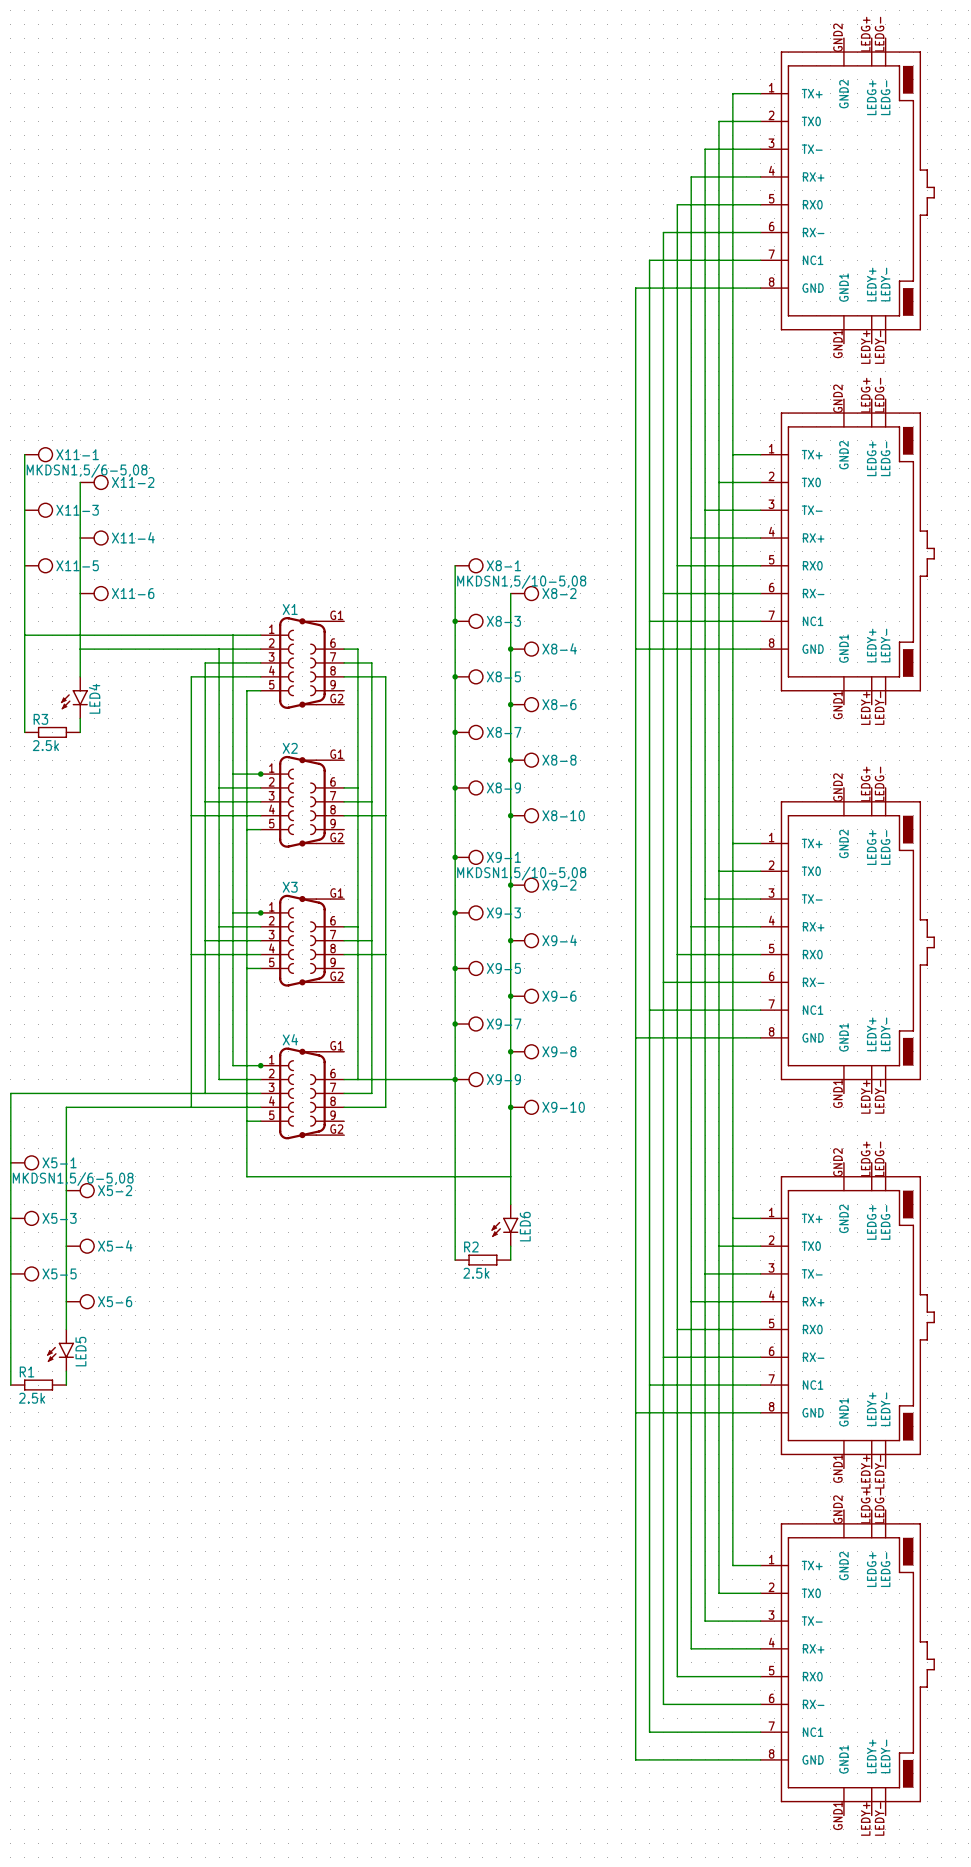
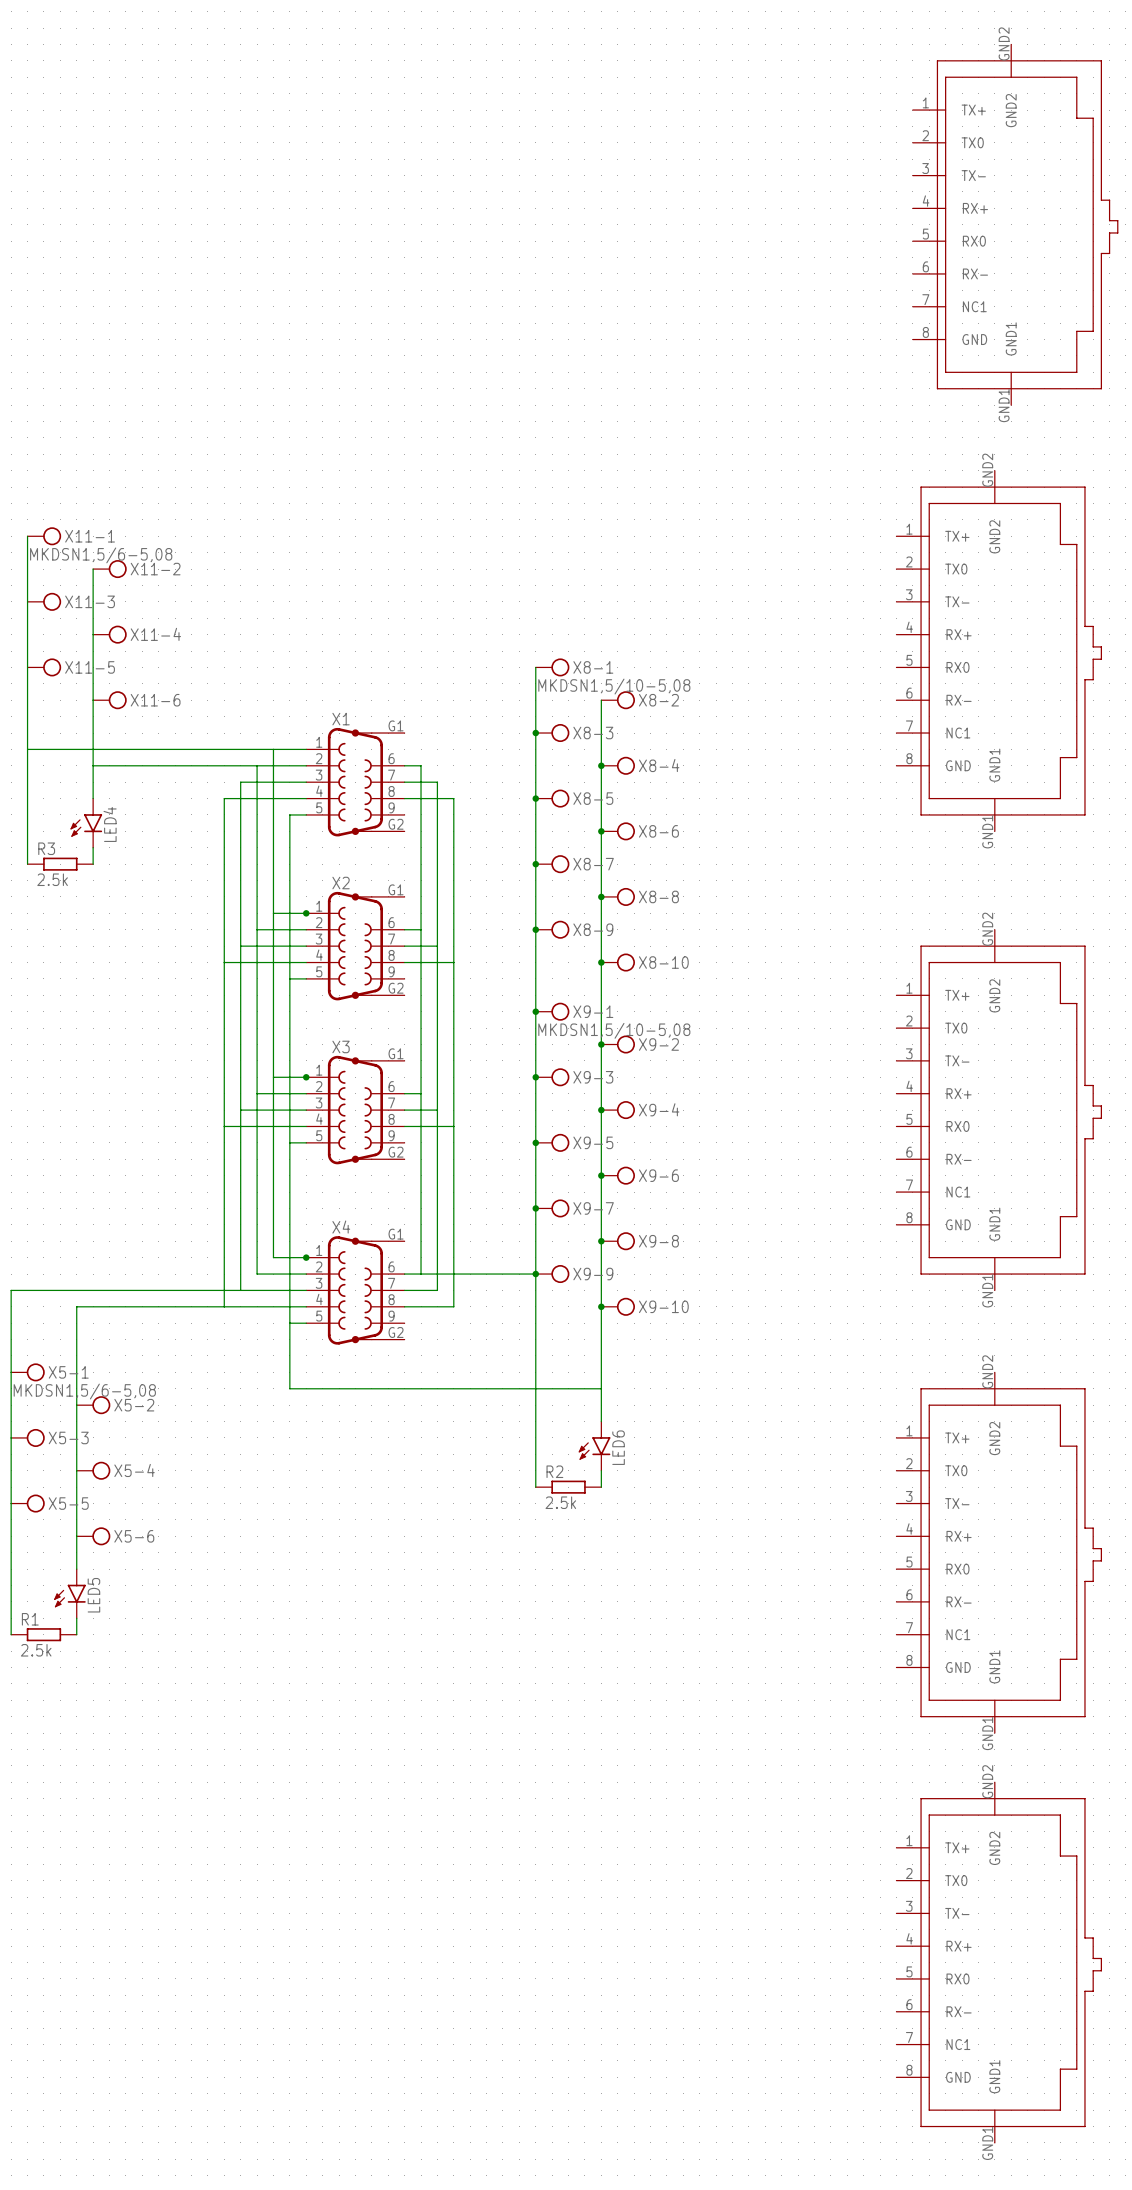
wire: (760, 93) (732, 93) (732, 1565) (760, 1565) -> none
wire: (760, 121) (718, 121) (718, 1593) (760, 1593) -> none
wire: (760, 149) (705, 149) (705, 1621) (760, 1621) -> none
wire: (760, 176) (691, 176) (691, 1648) (760, 1648) -> none
part: (847, 190) -> none
part: none -> (1015, 224)
wire: (760, 204) (677, 204) (677, 1676) (760, 1676) -> none
wire: (760, 232) (663, 232) (663, 1704) (760, 1704) -> none
wire: (760, 260) (649, 260) (649, 1732) (760, 1732) -> none
wire: (760, 288) (635, 288) (635, 1759) (760, 1759) -> none
part symbol: [760, 399, 935, 705] -> [896, 470, 1102, 832]
wire: (732, 454) (760, 454) -> none
wire: (718, 482) (760, 482) -> none
wire: (705, 510) (760, 510) -> none
wire: (691, 538) (760, 538) -> none
wire: (677, 565) (760, 565) -> none
wire: (663, 593) (760, 593) -> none
wire: (649, 621) (760, 621) -> none
wire: (635, 649) (760, 649) -> none
part symbol: [760, 787, 935, 1094] -> [896, 929, 1102, 1291]
wire: (732, 843) (760, 843) -> none
wire: (718, 871) (760, 871) -> none
wire: (705, 899) (760, 899) -> none
wire: (691, 926) (760, 926) -> none
wire: (677, 954) (760, 954) -> none
wire: (663, 982) (760, 982) -> none
wire: (649, 1010) (760, 1010) -> none
wire: (635, 1037) (760, 1037) -> none
part symbol: [760, 1162, 935, 1469] -> [896, 1372, 1102, 1734]
wire: (732, 1218) (760, 1218) -> none
wire: (718, 1246) (760, 1246) -> none
wire: (705, 1273) (760, 1273) -> none
wire: (691, 1301) (760, 1301) -> none
wire: (677, 1329) (760, 1329) -> none
wire: (663, 1357) (760, 1357) -> none
wire: (649, 1385) (760, 1385) -> none
wire: (635, 1412) (760, 1412) -> none
part symbol: [760, 1510, 935, 1816] -> [896, 1782, 1102, 2143]

